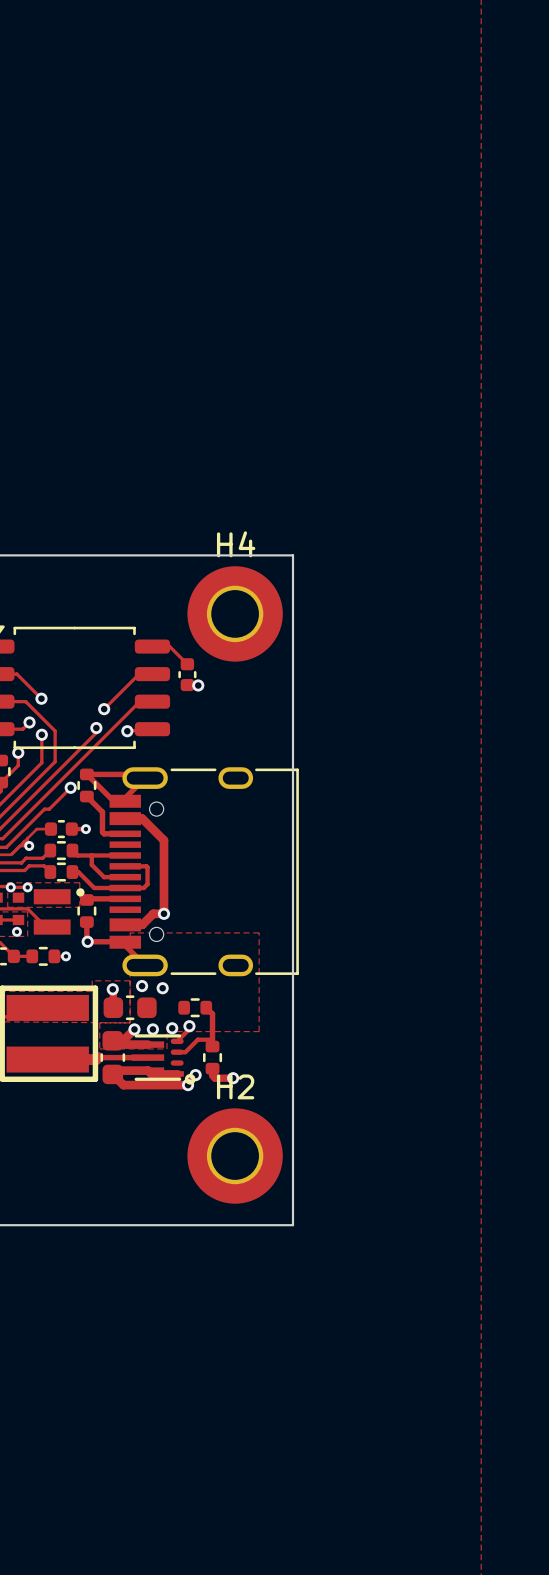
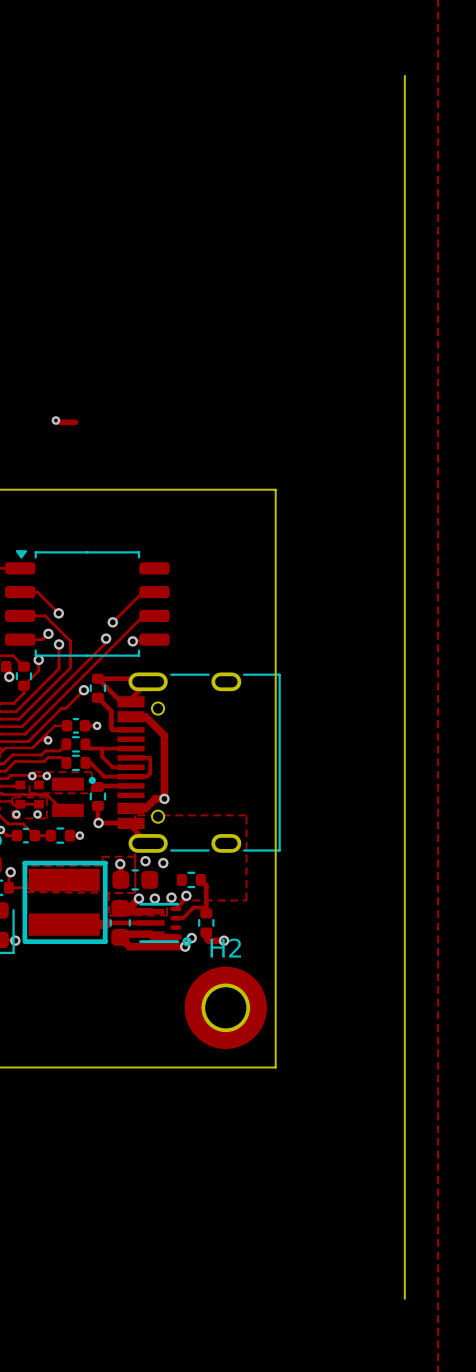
board edge: none -> (404, 75) (404, 1298)
track: none -> (55, 420) (57, 422) (75, 422)
via: none -> (55, 420)
H4: (235, 613) -> none
track: (152, 646) (169, 646) (187, 664) -> none
part: (187, 674) -> none
via: (198, 685) -> none

